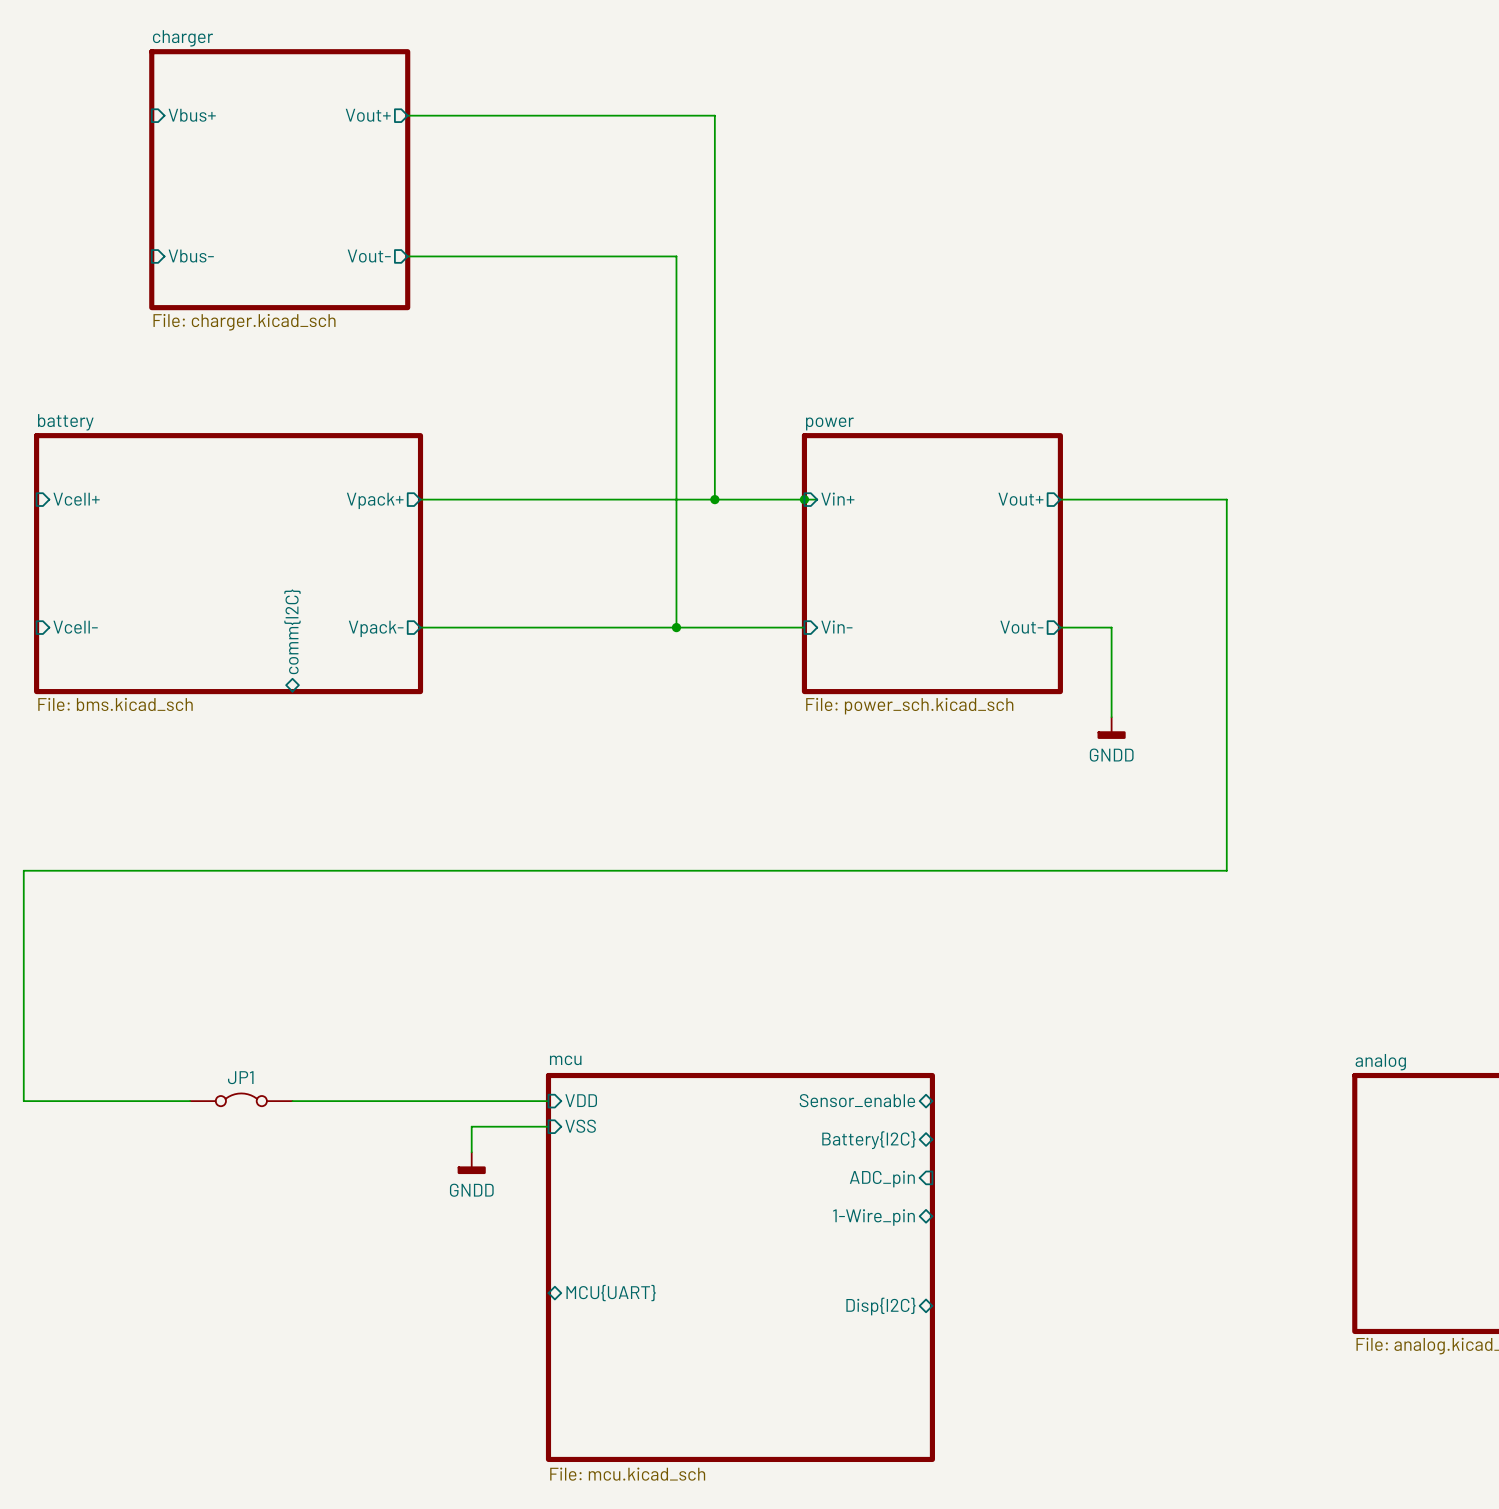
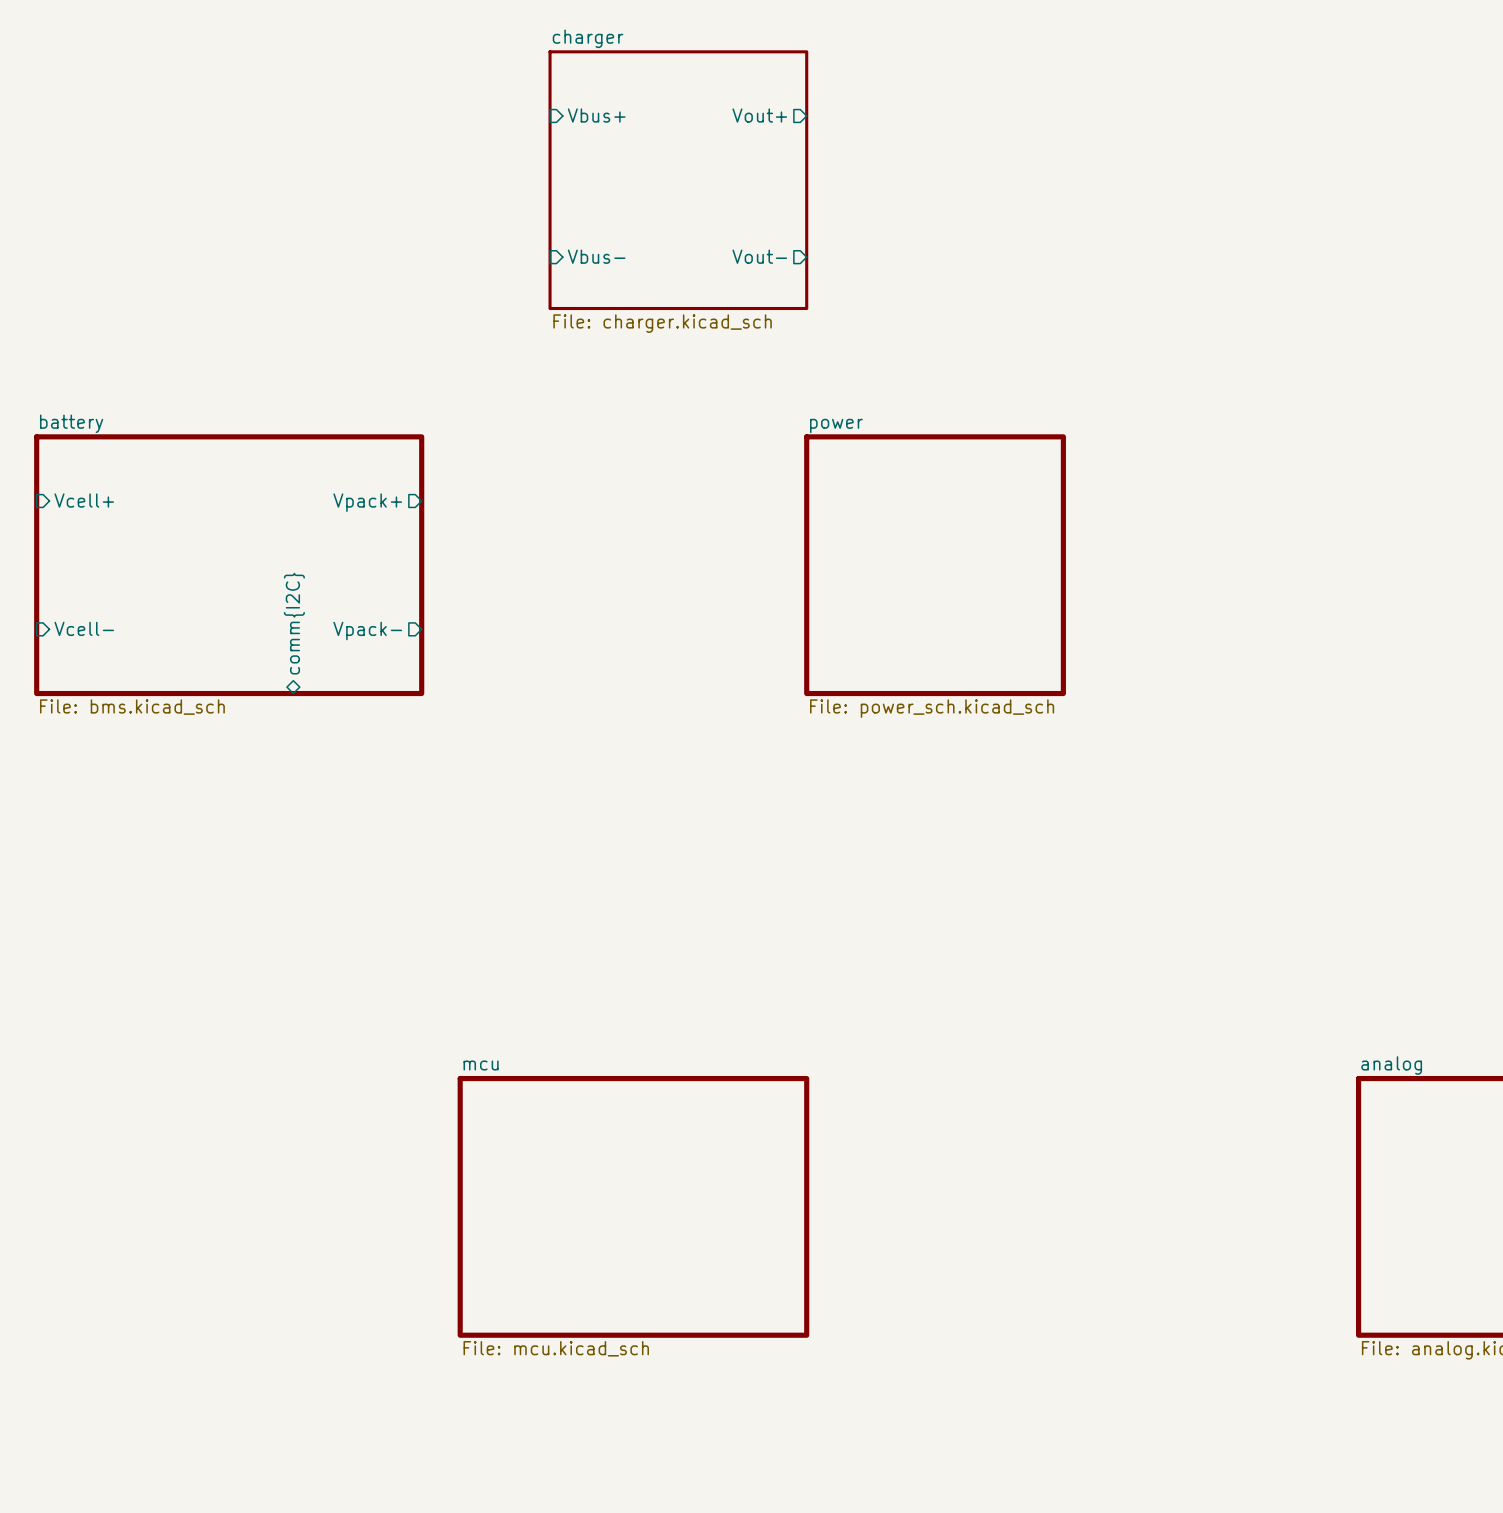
sheet pin: Vbus+ (192, 115) -> none
sheet pin: Vout+ (368, 115) -> none
wire: (407, 115) (714, 115) (714, 499) -> none
sheet pin: none -> Vbus+ (596, 115)
sheet pin: none -> Vout+ (759, 115)
sheet charger: File: charger.kicad_sch (279, 179) -> none
sheet charger: none -> File: charger.kicad_sch (678, 180)
sheet pin: Vbus- (191, 256) -> none
sheet pin: Vout- (369, 256) -> none
wire: (407, 256) (676, 256) (676, 627) -> none
sheet pin: none -> Vbus- (596, 256)
sheet pin: none -> Vout- (759, 256)
wire: (420, 499) (817, 499) -> none
junction: (714, 499) -> none
junction: (804, 499) -> none
sheet pin: Vin+ (837, 499) -> none
sheet pin: Vout+ (1020, 499) -> none
wire: (1060, 499) (1226, 499) (1226, 870) (23, 870) (23, 1101) (190, 1101) -> none
wire: (420, 627) (804, 627) -> none
junction: (676, 627) -> none
sheet pin: Vin- (836, 627) -> none
sheet pin: Vout- (1021, 627) -> none
wire: (1060, 627) (1111, 627) (1111, 717) -> none
power symbol: GNDD (1111, 728) -> none
JP1: (241, 1099) -> none
sheet pin: VDD (581, 1100) -> none
sheet pin: Sensor_enable (857, 1100) -> none
wire: (292, 1101) (548, 1101) -> none
wire: (548, 1126) (471, 1126) (471, 1152) -> none
sheet pin: VSS (580, 1126) -> none
sheet pin: Battery{I2C} (868, 1140) -> none
power symbol: GNDD (471, 1163) -> none
sheet pin: ADC_pin (882, 1179) -> none
sheet mcu: none -> File: mcu.kicad_sch (633, 1206)
sheet pin: 1-Wire_pin (873, 1217) -> none
sheet mcu: File: mcu.kicad_sch (740, 1267) -> none
sheet pin: MCU{UART} (611, 1293) -> none
sheet pin: Disp{I2C} (880, 1306) -> none

